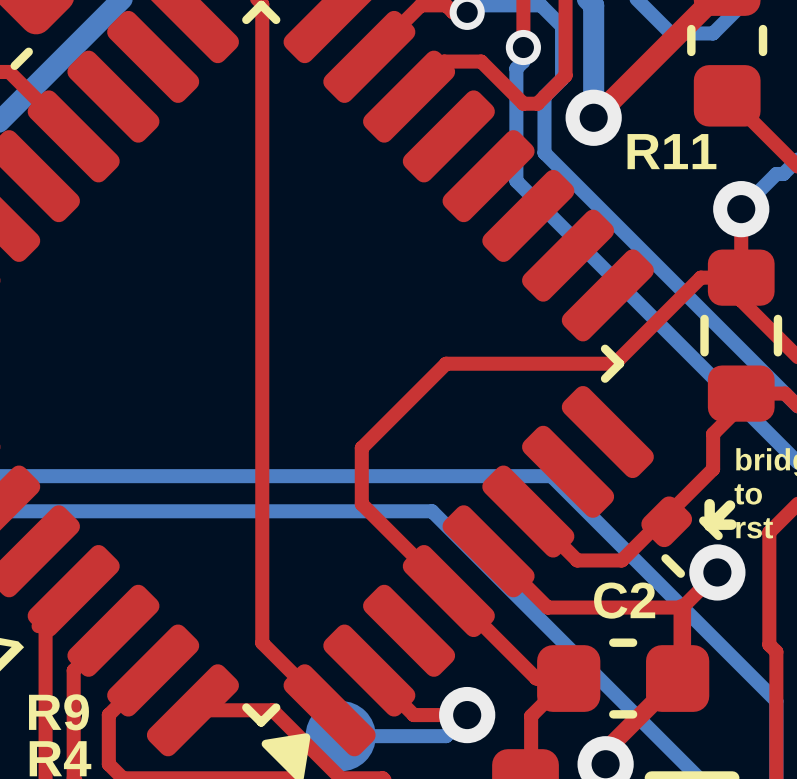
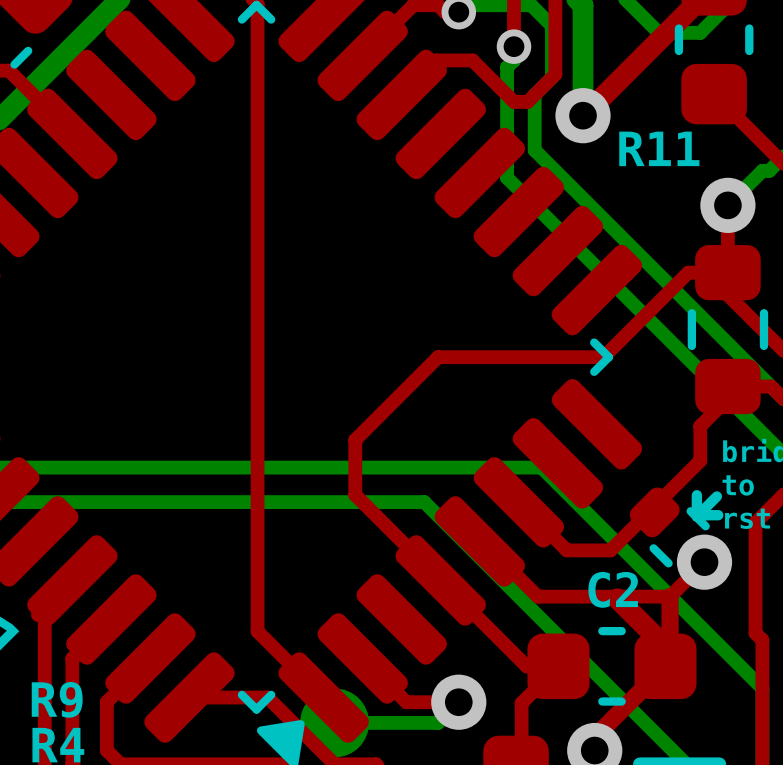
top track: none -> (617, 598) (665, 646)

